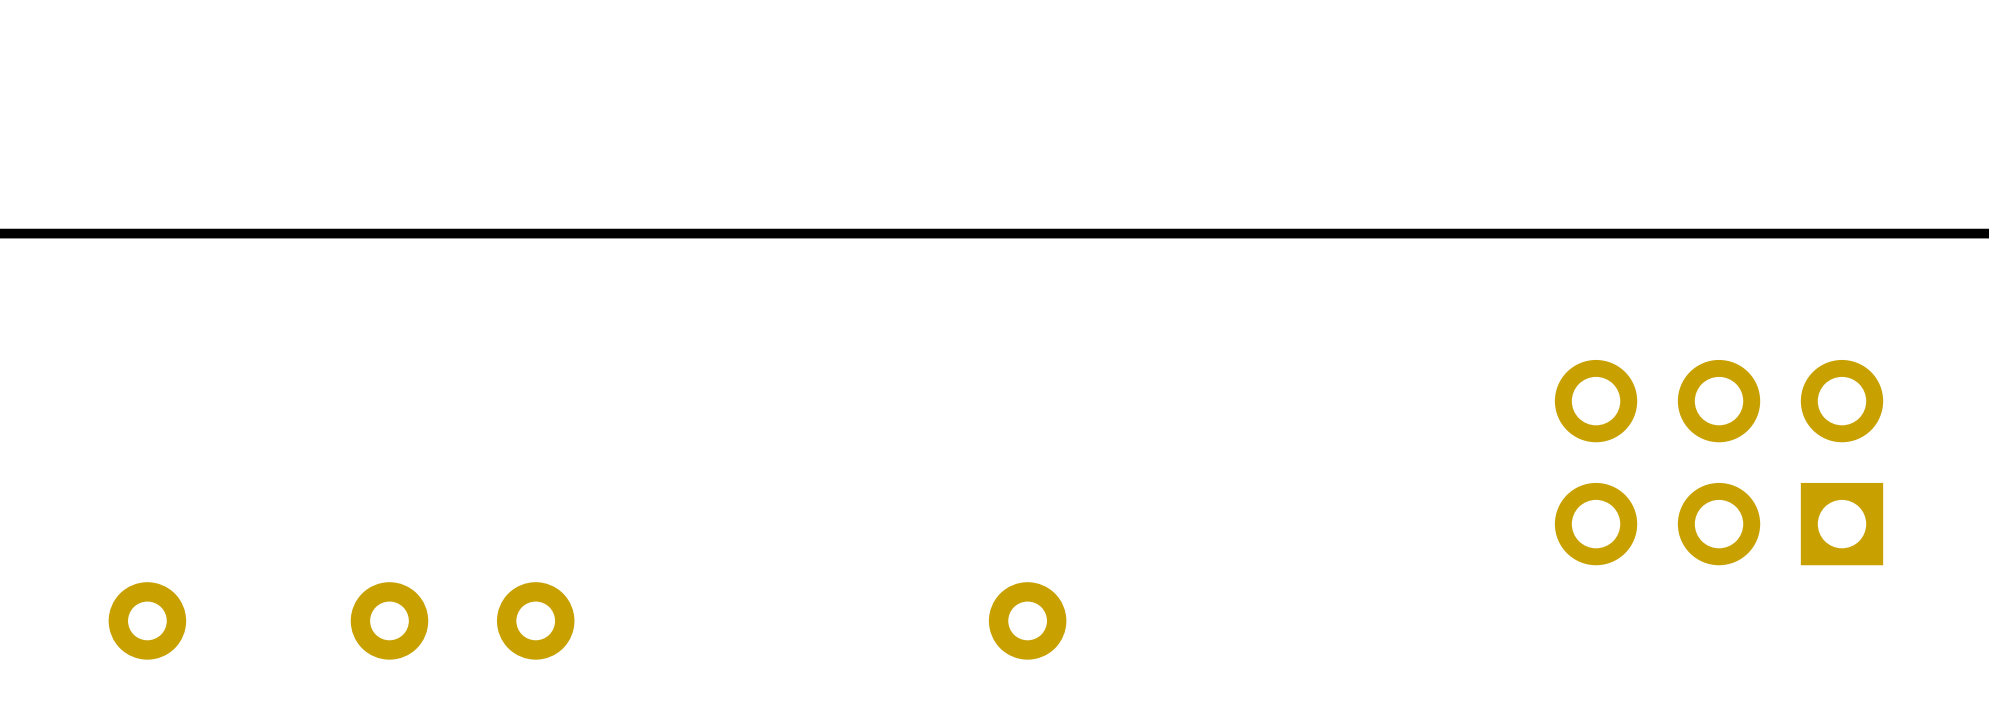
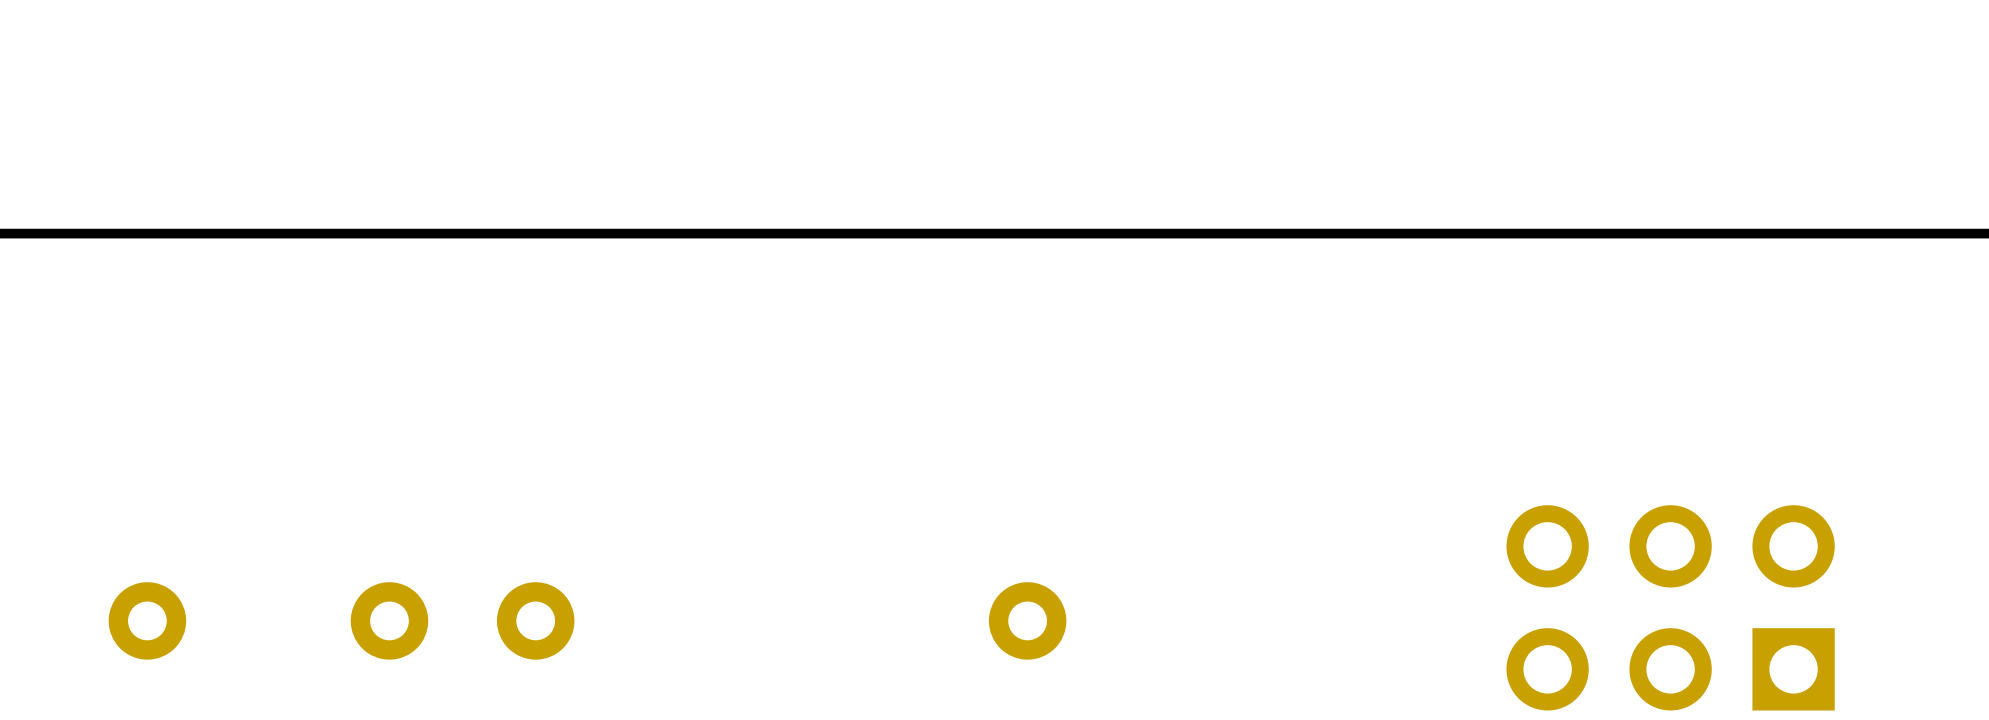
part position: (1719, 462) -> (1670, 607)

